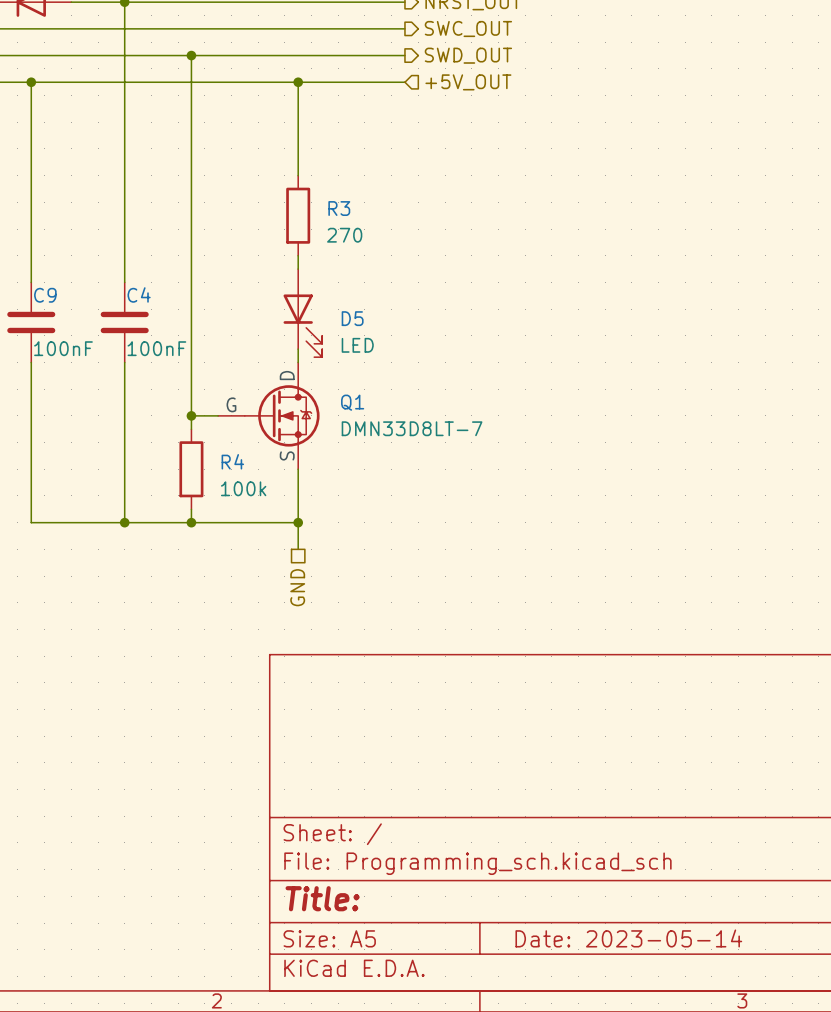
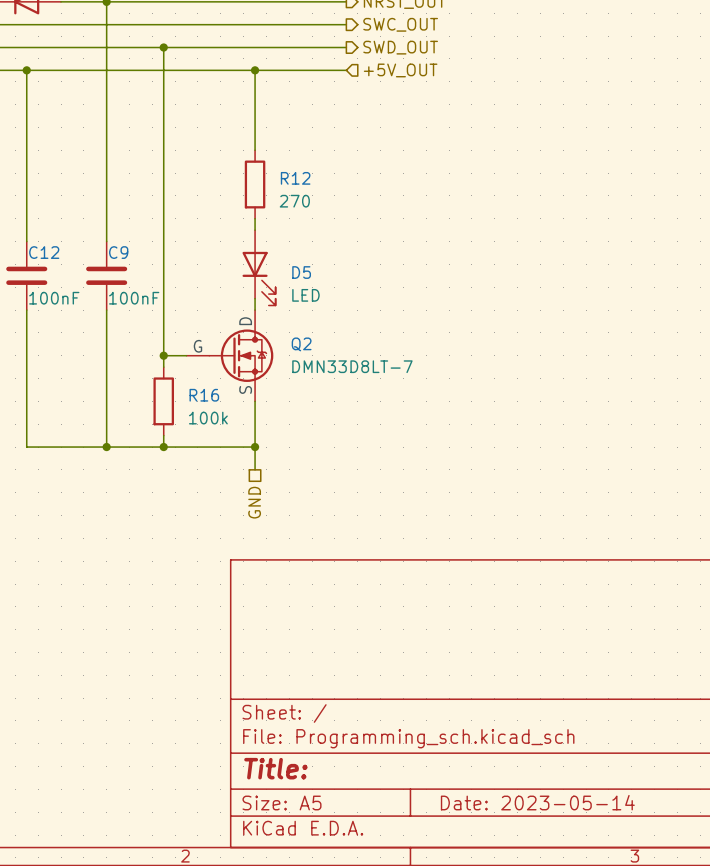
R3 name: R3 (339, 208) -> R12 (295, 178)
C4 name: C4 (139, 294) -> C9 (118, 252)
C9 name: C9 (45, 295) -> C12 (44, 252)
Q1 name: Q1 (352, 402) -> Q2 (301, 344)
R4 name: R4 (232, 461) -> R16 (204, 395)

